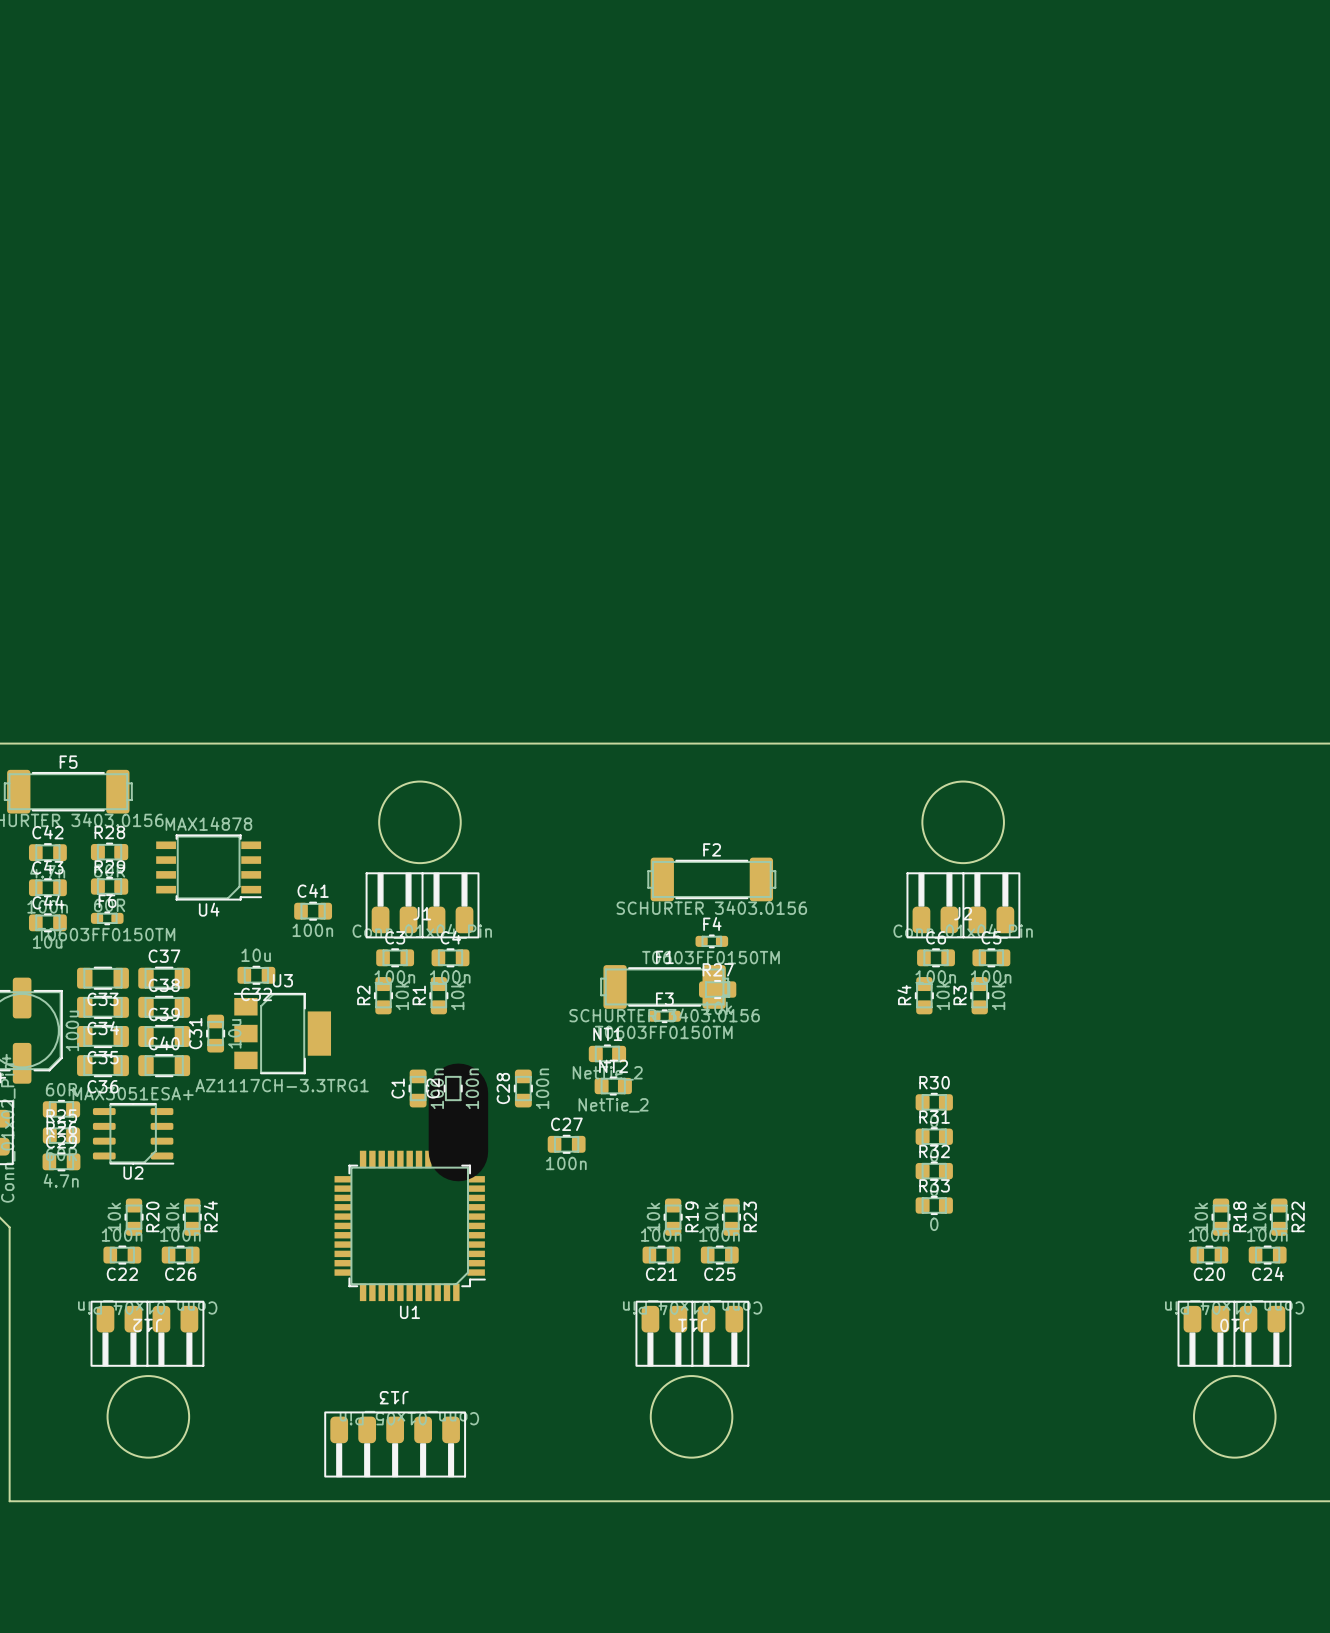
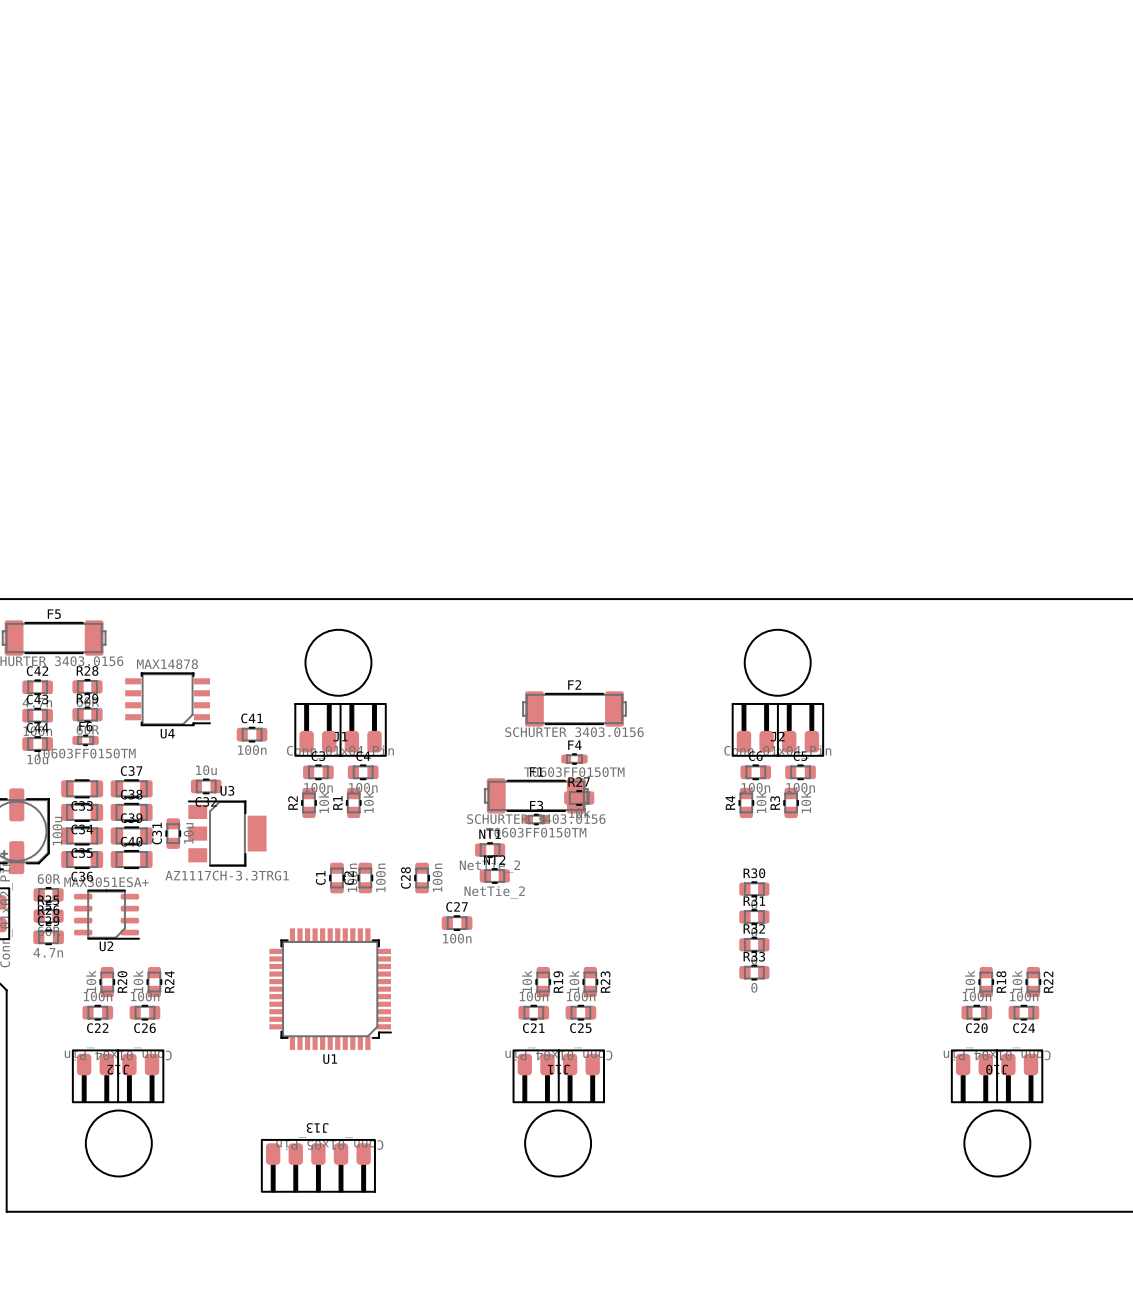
part: (458, 1122) -> none

